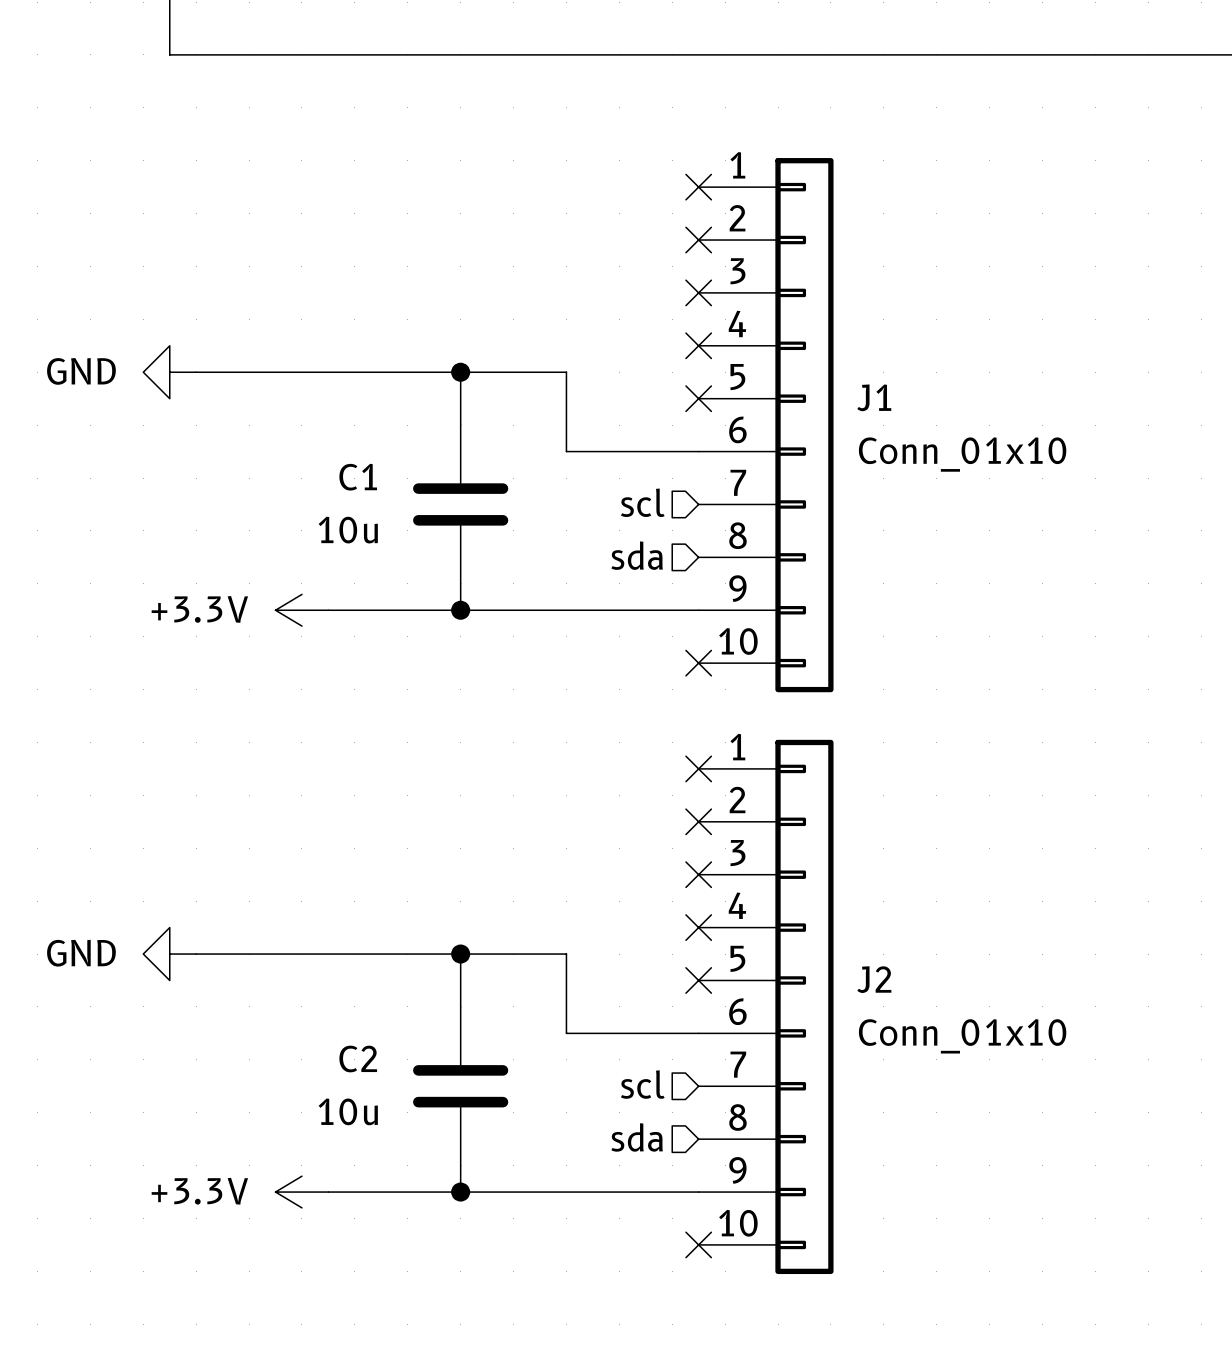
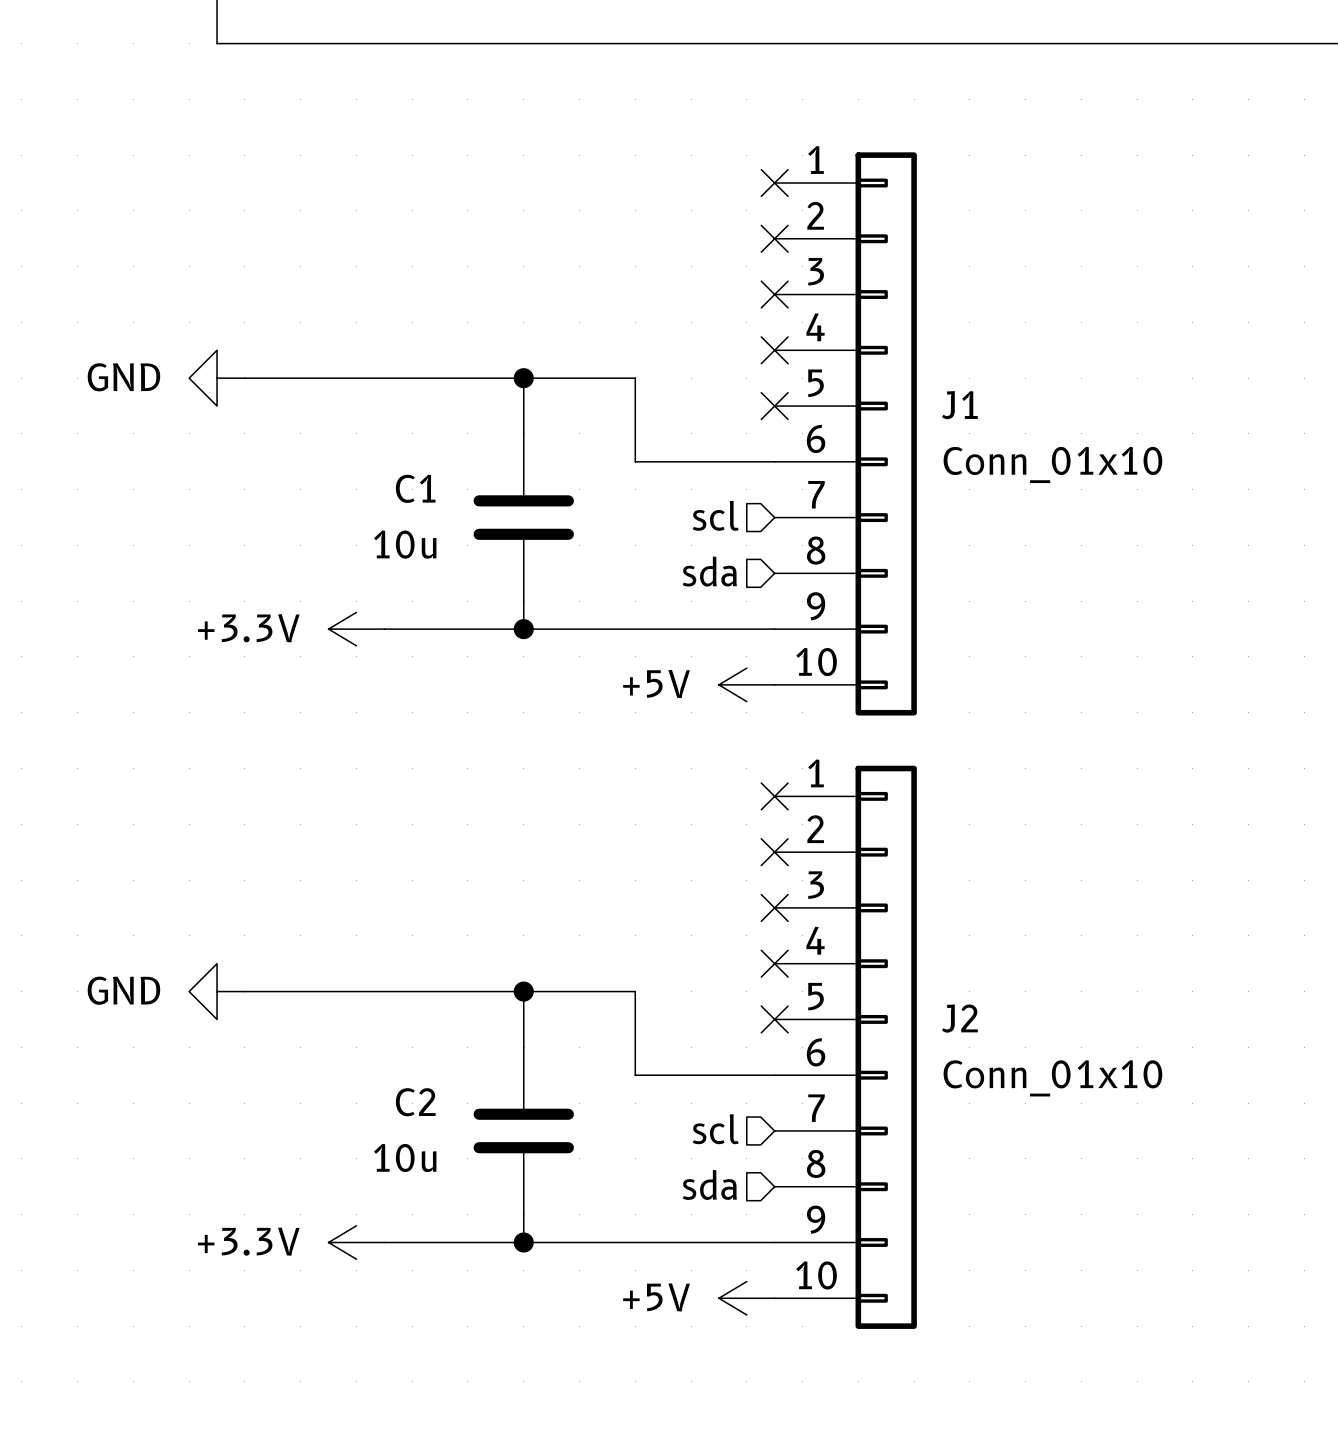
power symbol: none -> +5V (746, 684)
no-connect mark: (698, 663) -> none
power symbol: none -> +5V (746, 1298)
no-connect mark: (698, 1244) -> none

